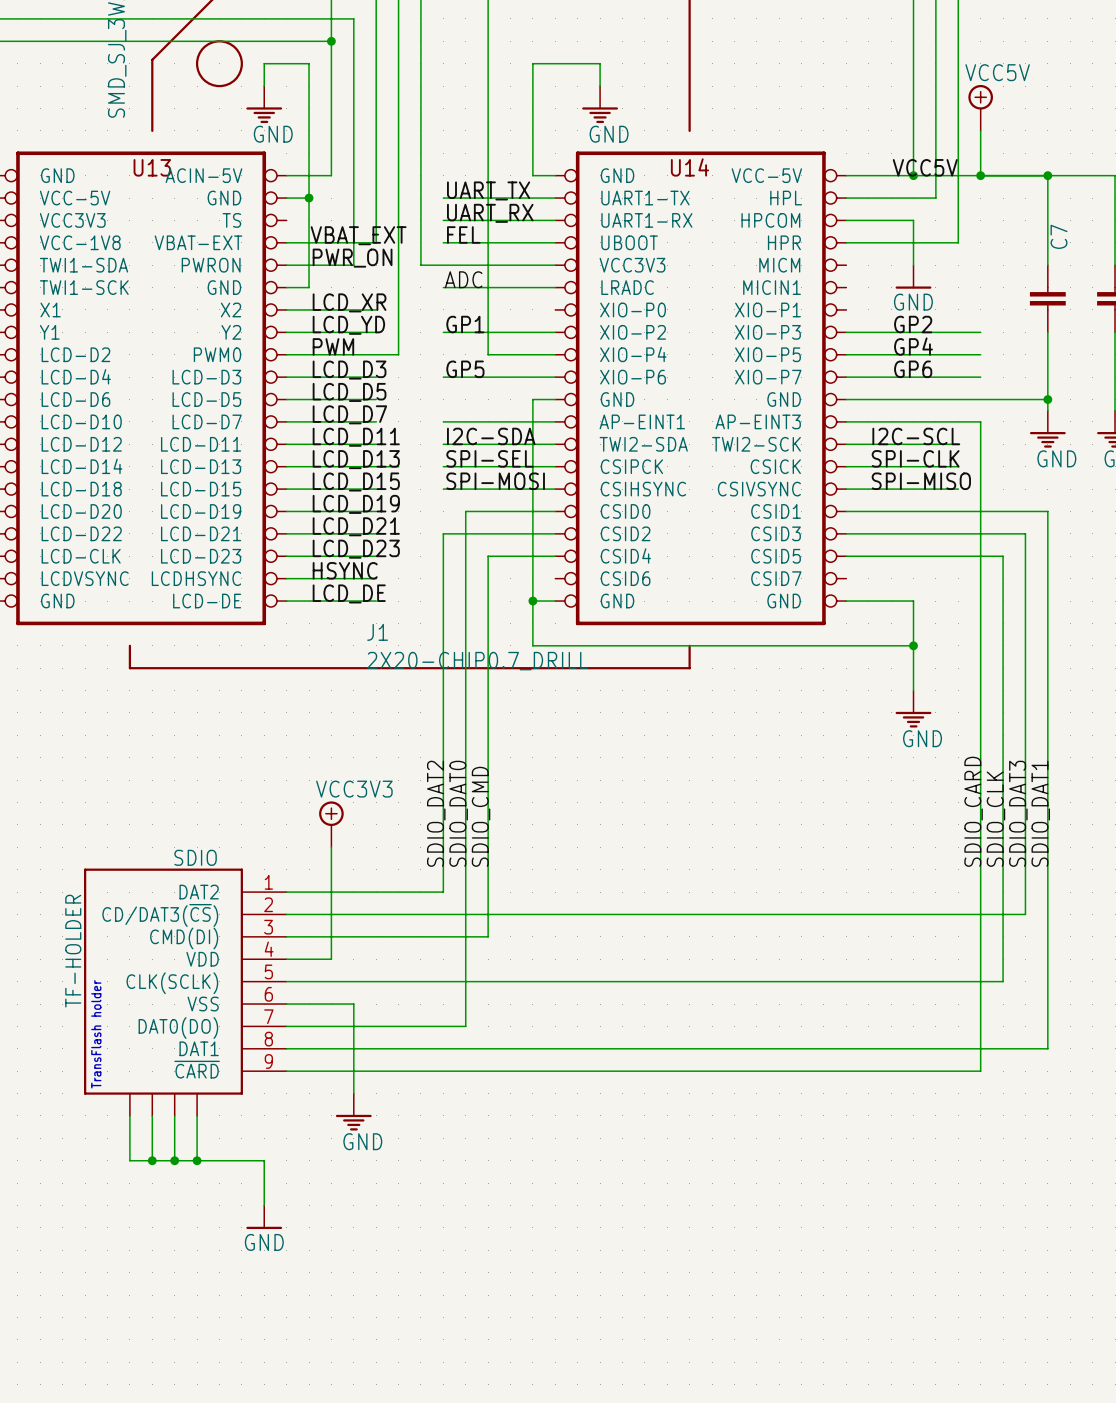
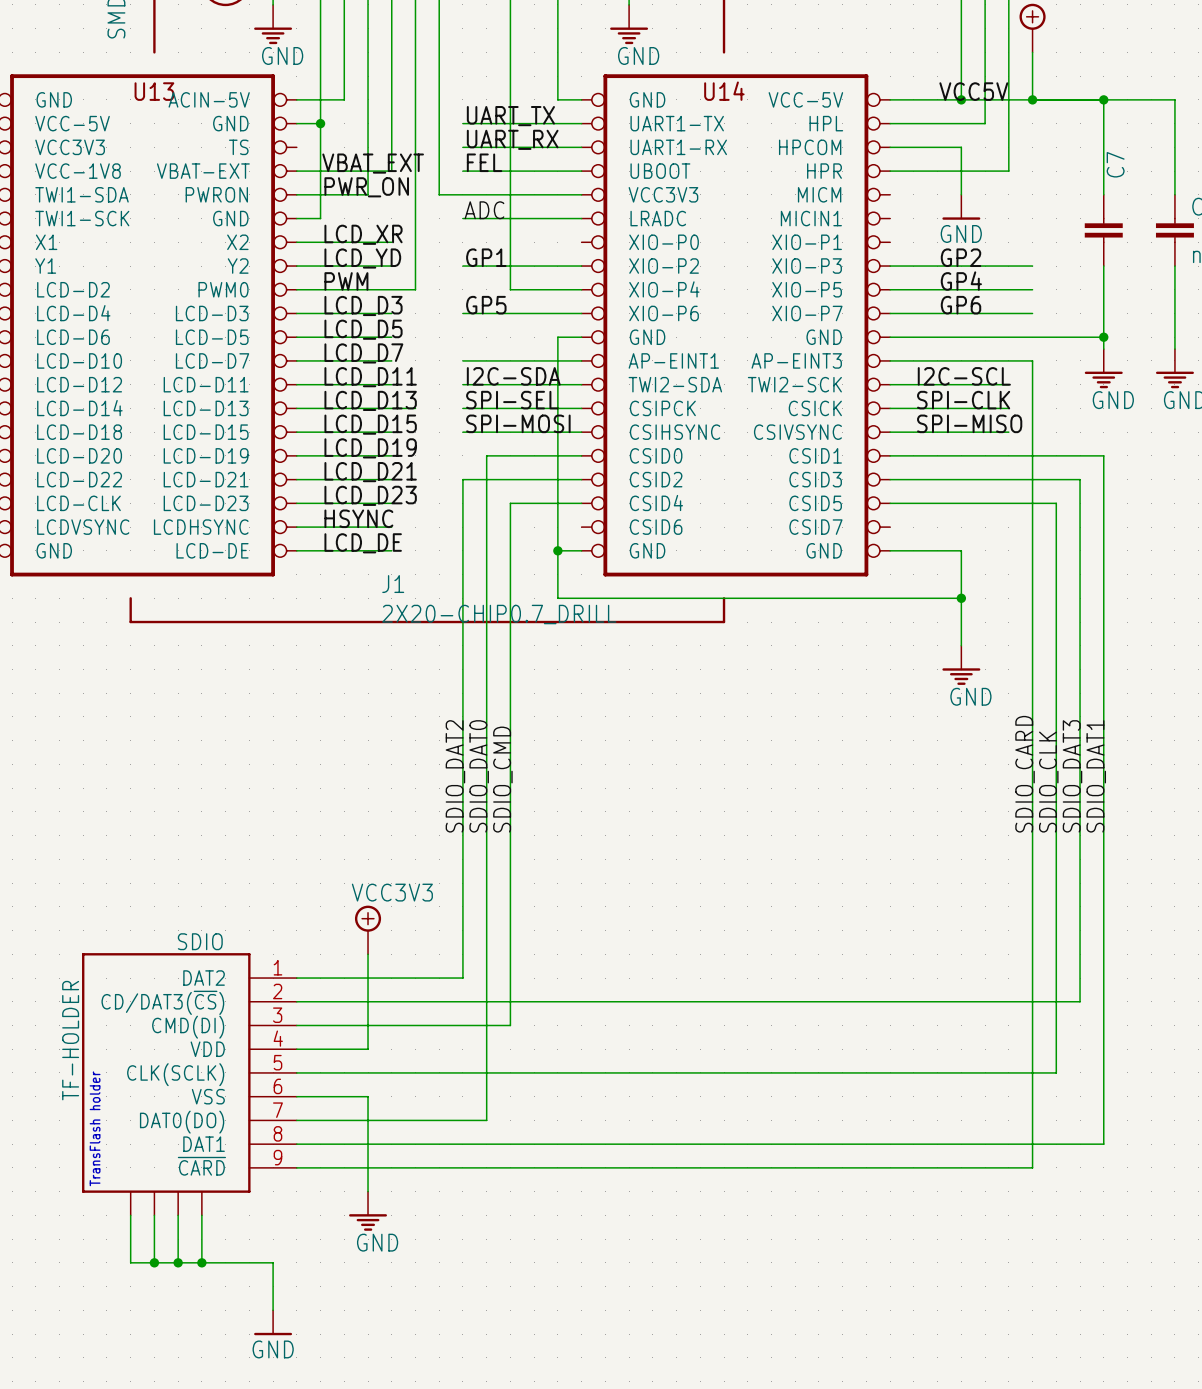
power symbol position: VCC3V3 (331, 824) -> VCC3V3 (368, 929)
wire: (331, 847) (331, 959) (286, 959) -> none
wire: (286, 892) (443, 892) -> (368, 954) (368, 978) (462, 978) (462, 859)
wire: (286, 914) (1025, 914) -> (296, 1120) (486, 1120) (486, 1001) (1080, 1001) (1080, 883)
wire: (286, 936) (488, 936) -> (510, 1025) (510, 906)
wire: (286, 981) (1003, 981) -> (296, 1072) (1056, 1072) (1056, 954)
SDIO position: (185, 992) -> (189, 1084)
wire: (488, 1048) (1047, 1048) -> (296, 1144) (1103, 1144) (1103, 1025)
wire: (980, 1071) (353, 1071) (353, 1093) -> (1032, 1049) (1032, 1167) (296, 1167)
power symbol position: GND (353, 1112) -> GND (368, 1211)
wire: (129, 1115) (129, 1160) (264, 1160) (264, 1205) -> (130, 1215) (130, 1262) (273, 1262) (273, 1310)
wire: (152, 1115) (152, 1160) -> (154, 1215) (154, 1262)
wire: (174, 1115) (174, 1160) -> (178, 1215) (178, 1262)
wire: (197, 1115) (197, 1160) -> (201, 1215) (201, 1262)
wire: none -> (296, 1096) (368, 1096) (368, 1191)
junction: (152, 1160) -> none
junction: (174, 1160) -> none
junction: (197, 1160) -> none
power symbol position: GND (264, 1217) -> GND (273, 1322)
junction: none -> (154, 1262)
junction: none -> (178, 1262)
junction: none -> (201, 1262)

